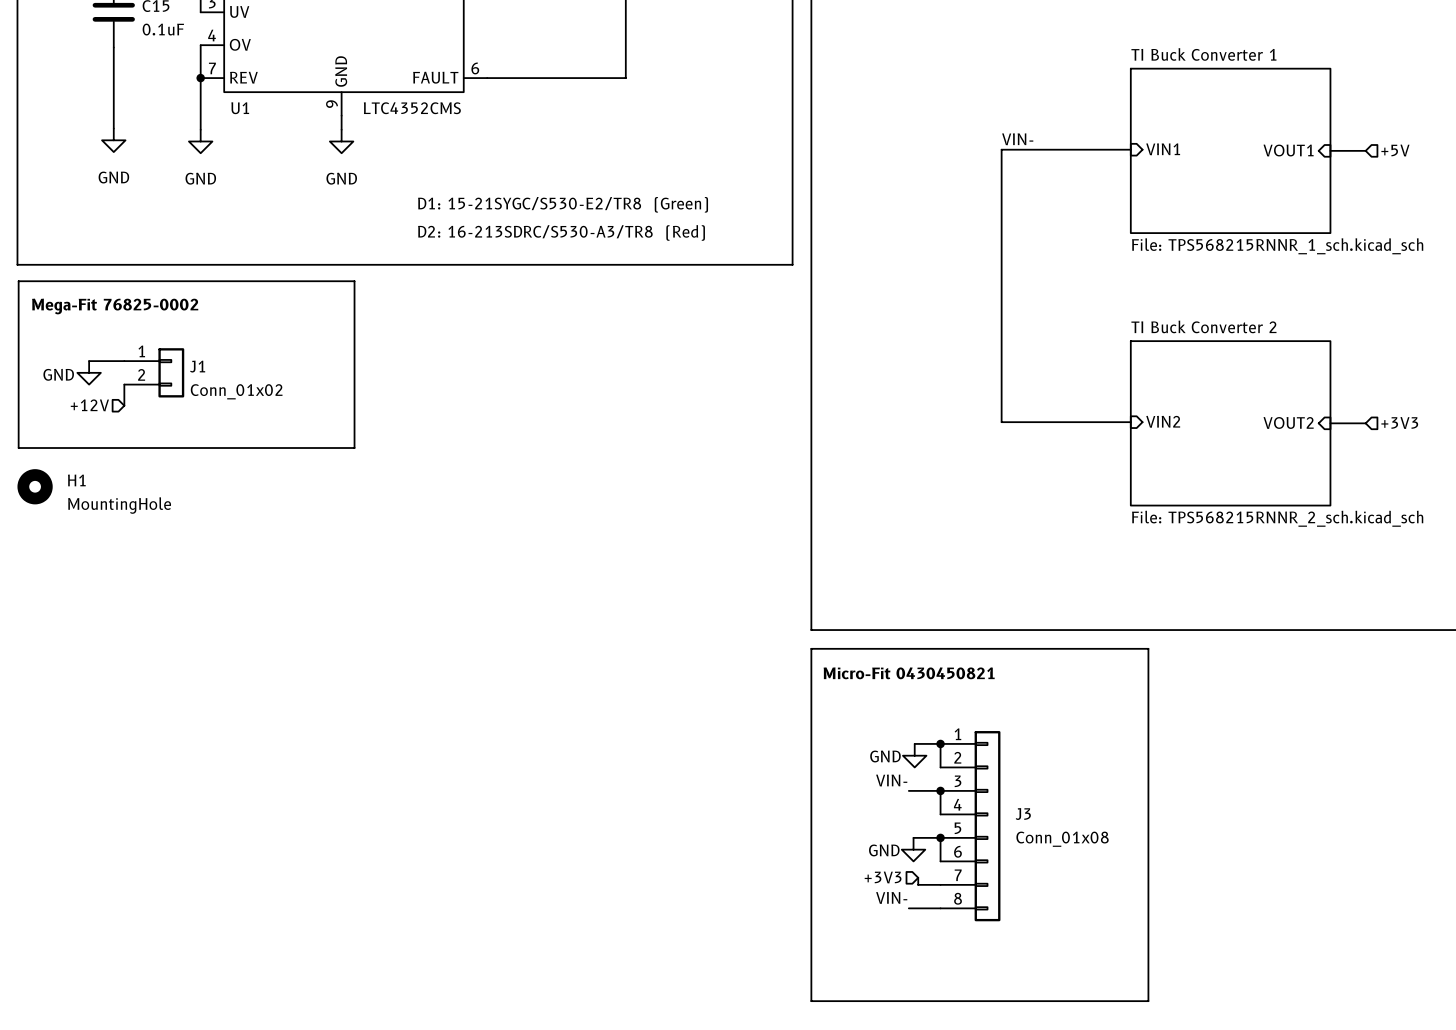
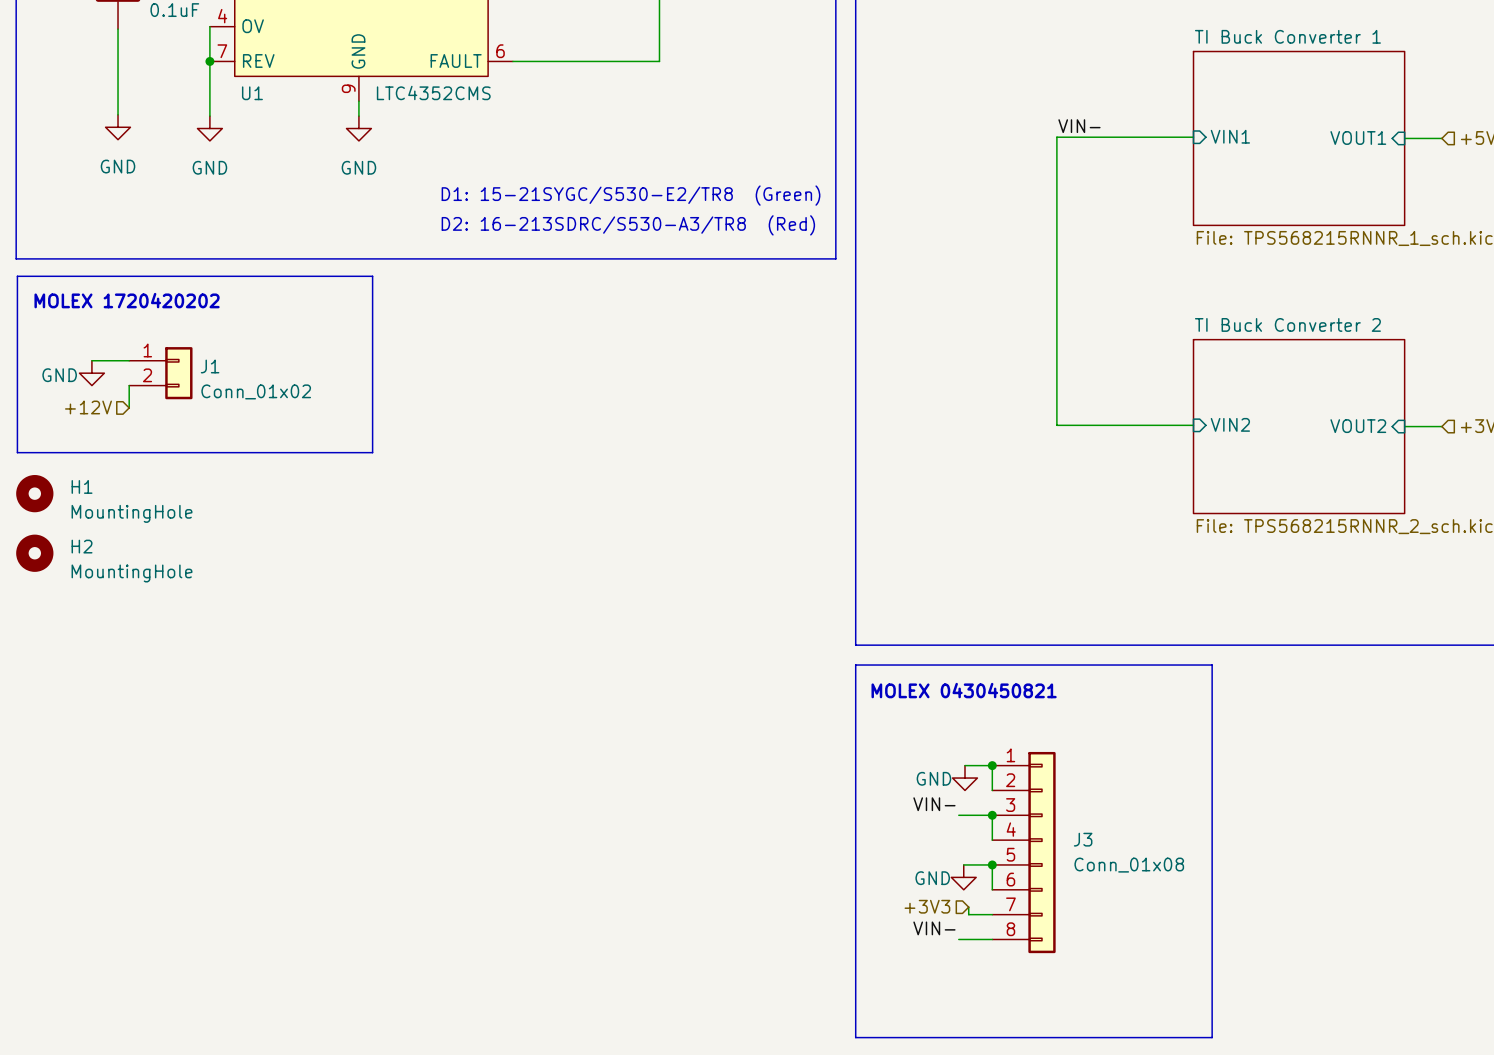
text: Mega-Fit 76825-0002 (115, 306) -> MOLEX 1720420202 (127, 300)
H2: none -> MountingHole (34, 553)
text: Micro-Fit 0430450821 (909, 673) -> MOLEX 0430450821 (964, 690)

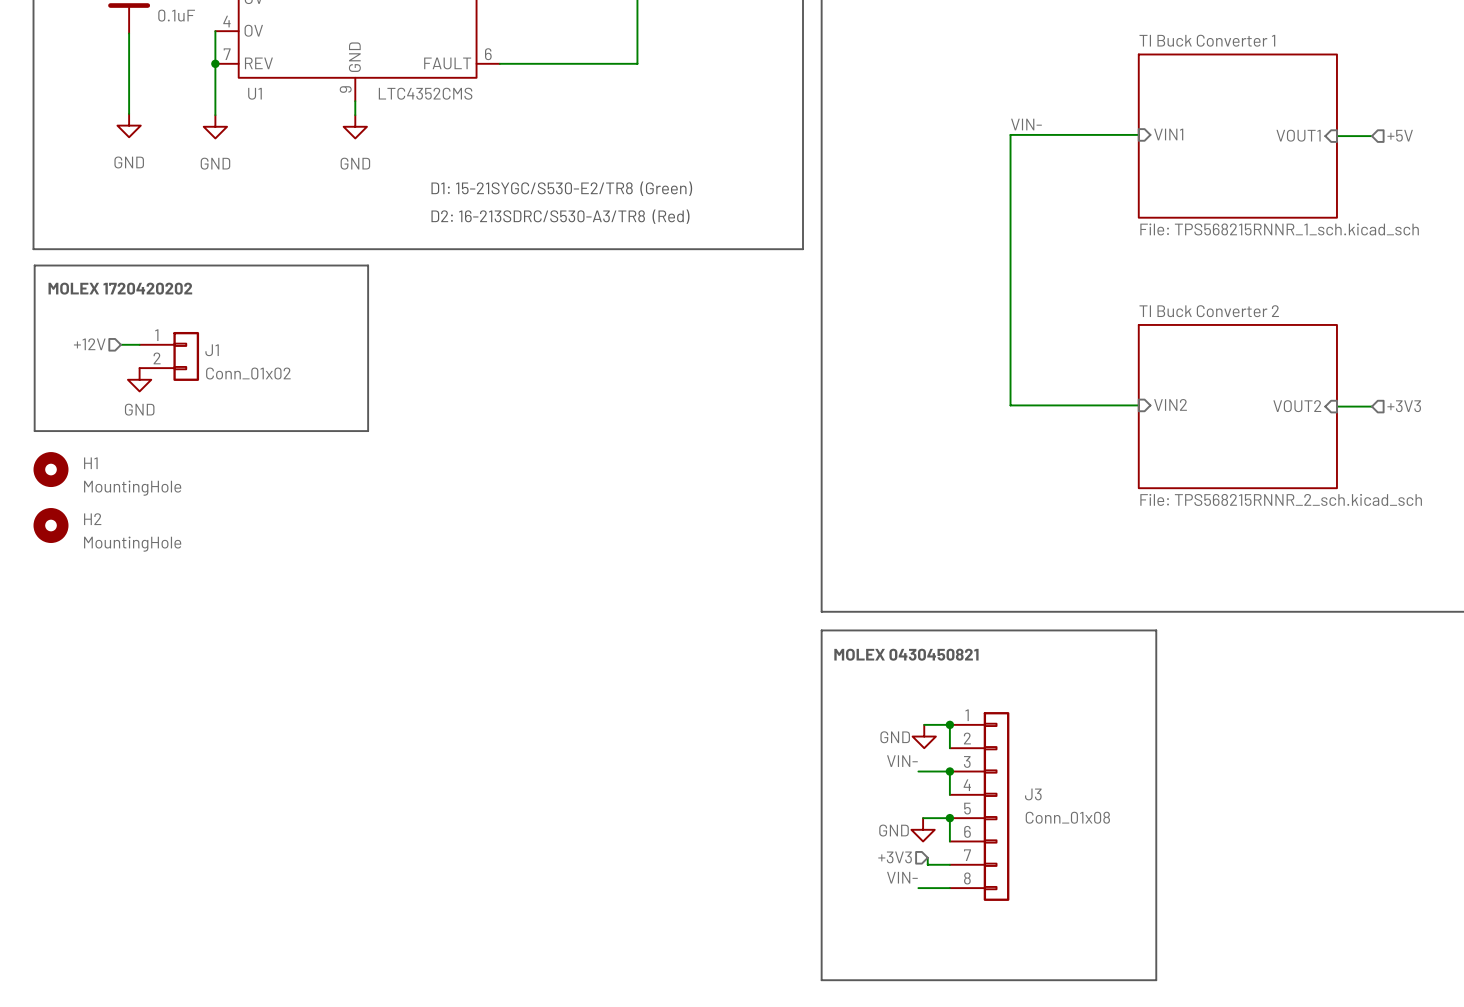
wire: (91, 360) (109, 360) -> none
power symbol position: GND (91, 373) -> GND (139, 379)
power symbol text position: GND (59, 375) -> GND (139, 409)
hierarchical label position: +12V (88, 407) -> +12V (89, 344)

